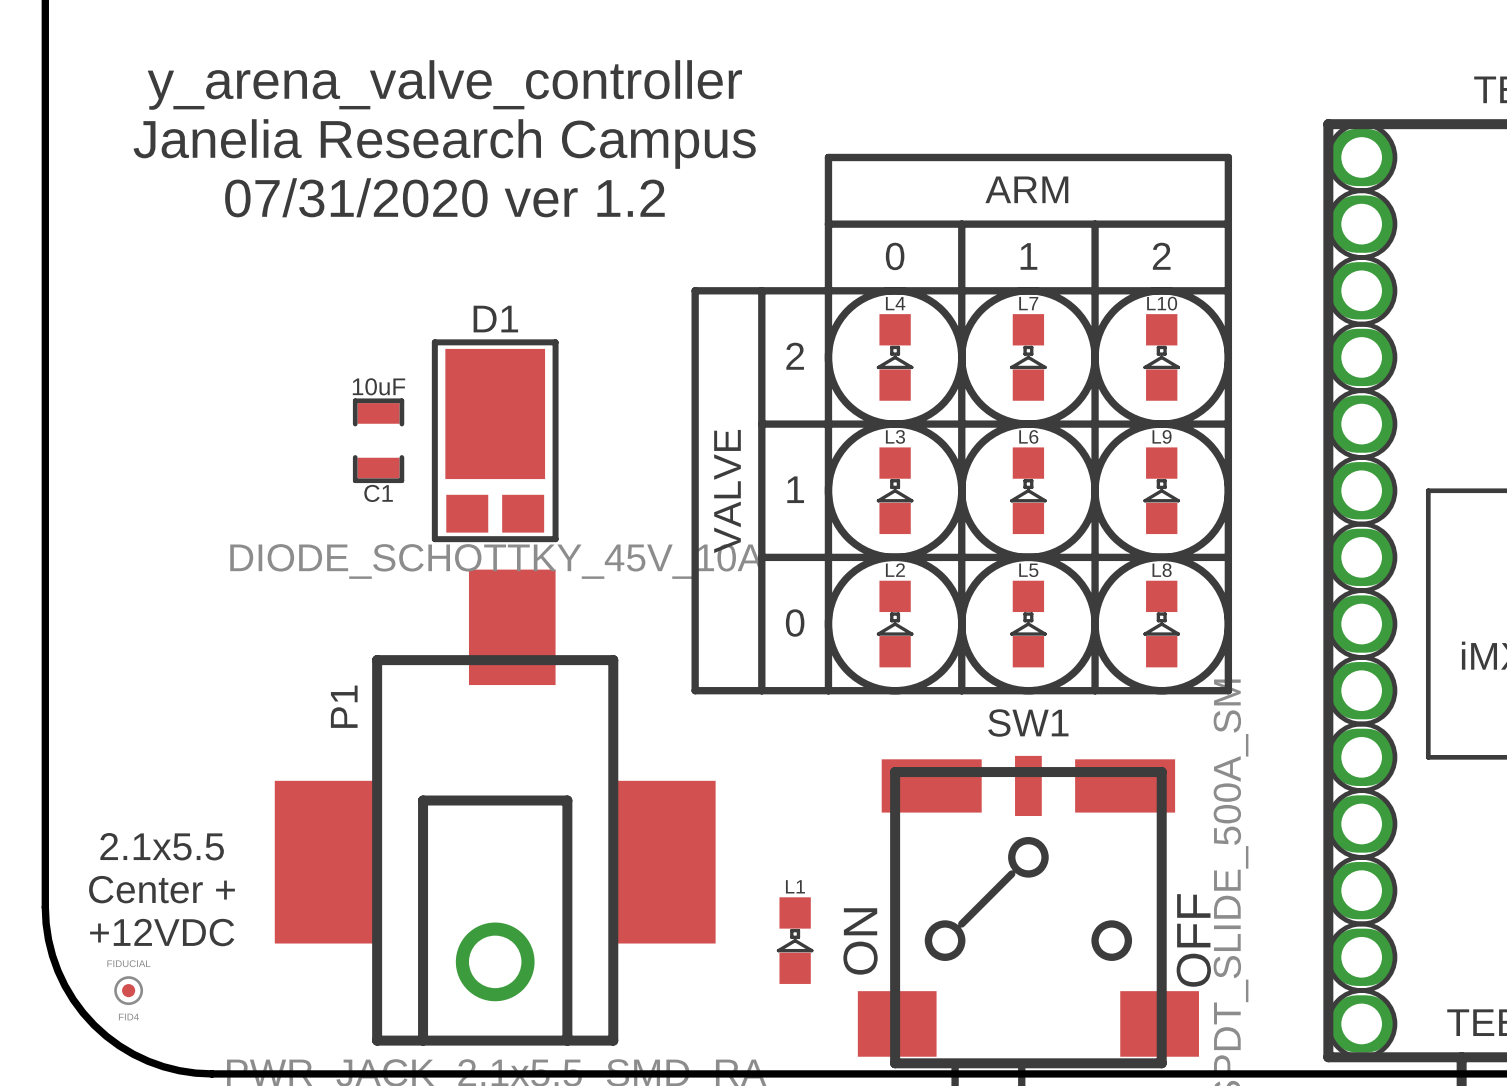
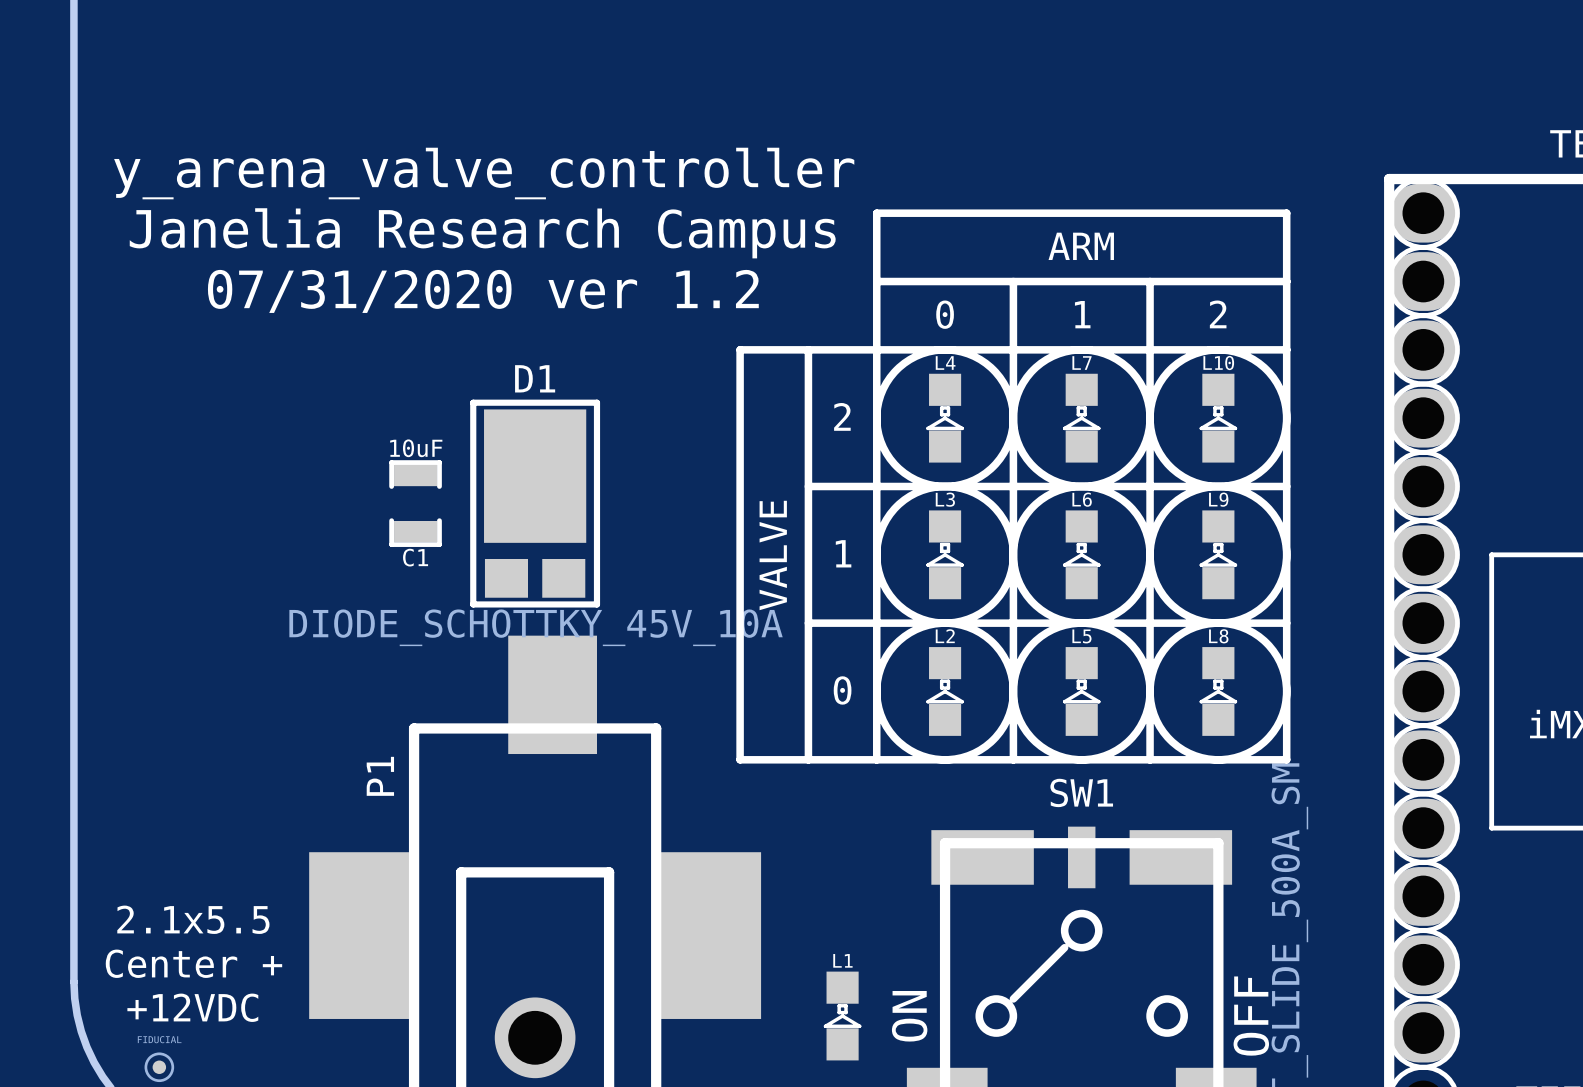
text position: y_arena_valve_controller (444, 84) -> y_arena_valve_controller (484, 173)
text position: Janelia Research Campus (444, 144) -> Janelia Research Campus (482, 233)
text position: 07/31/2020 ver 1.2 (444, 197) -> 07/31/2020 ver 1.2 (483, 291)

